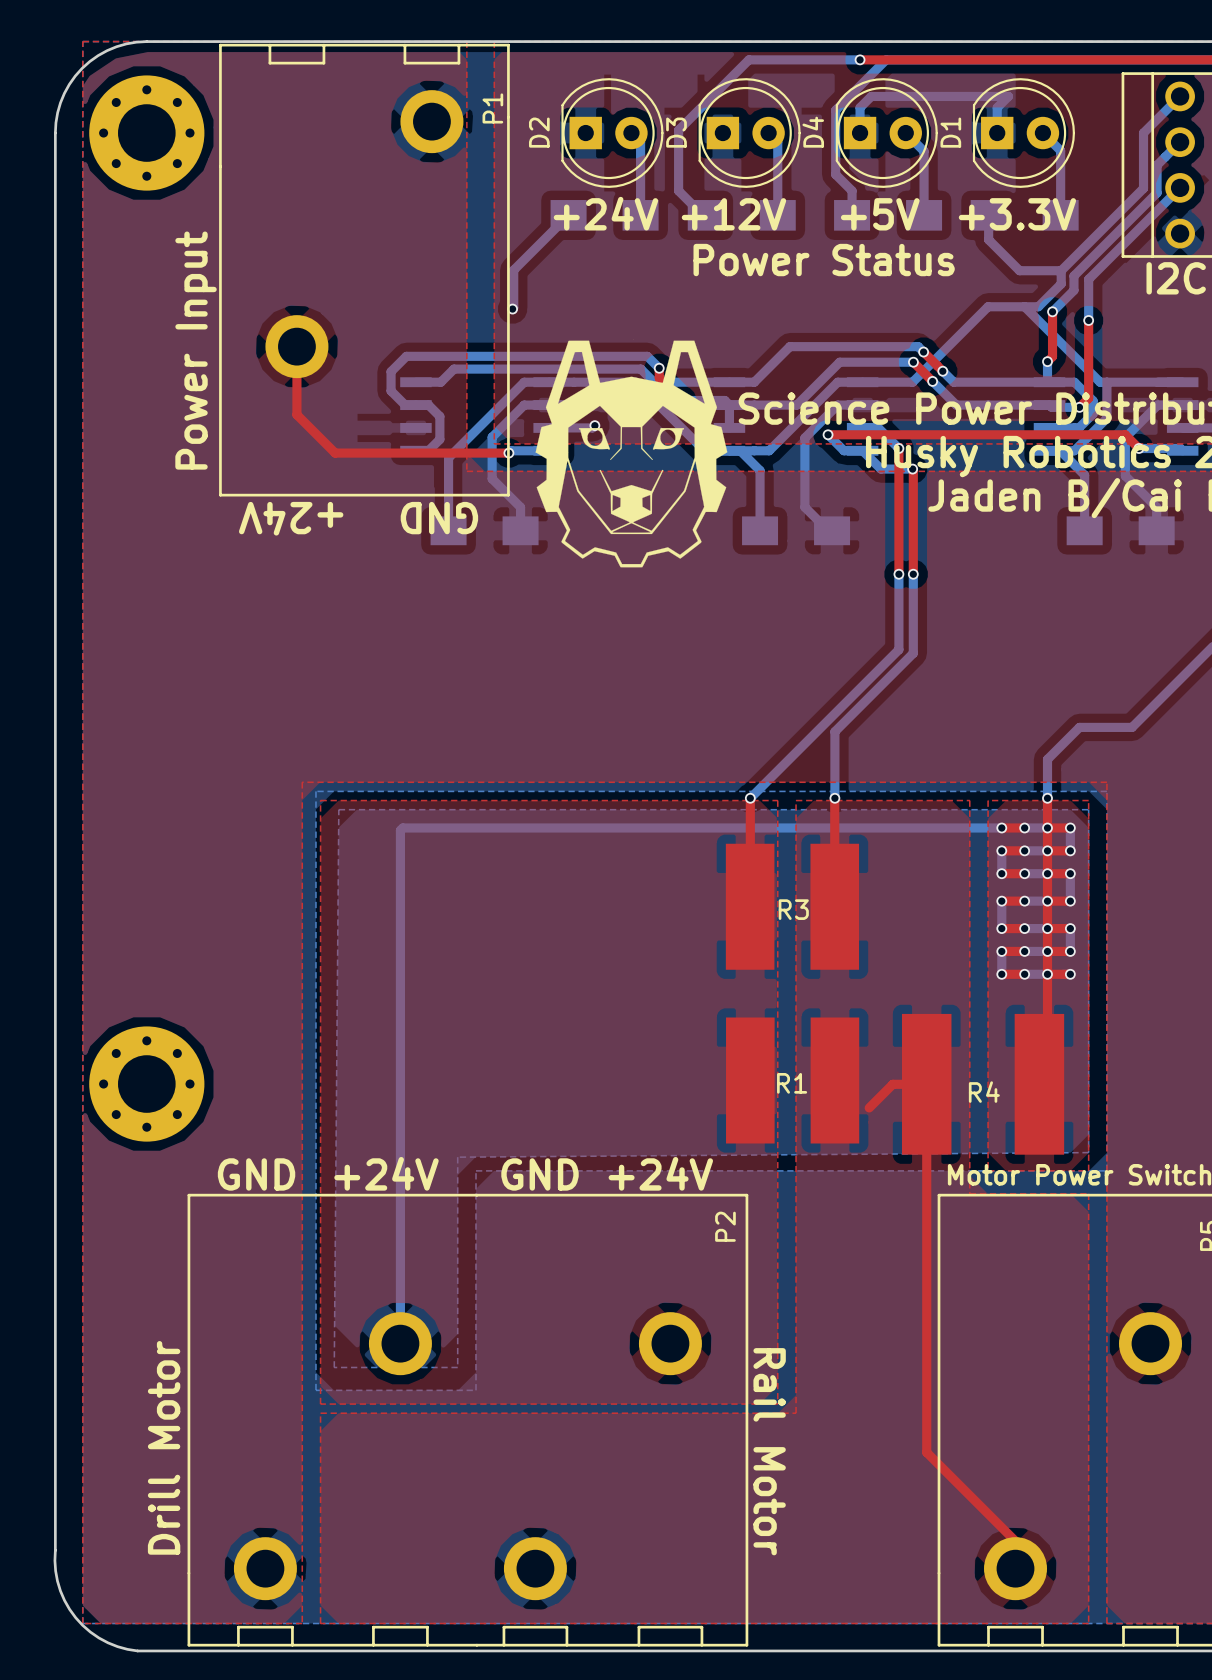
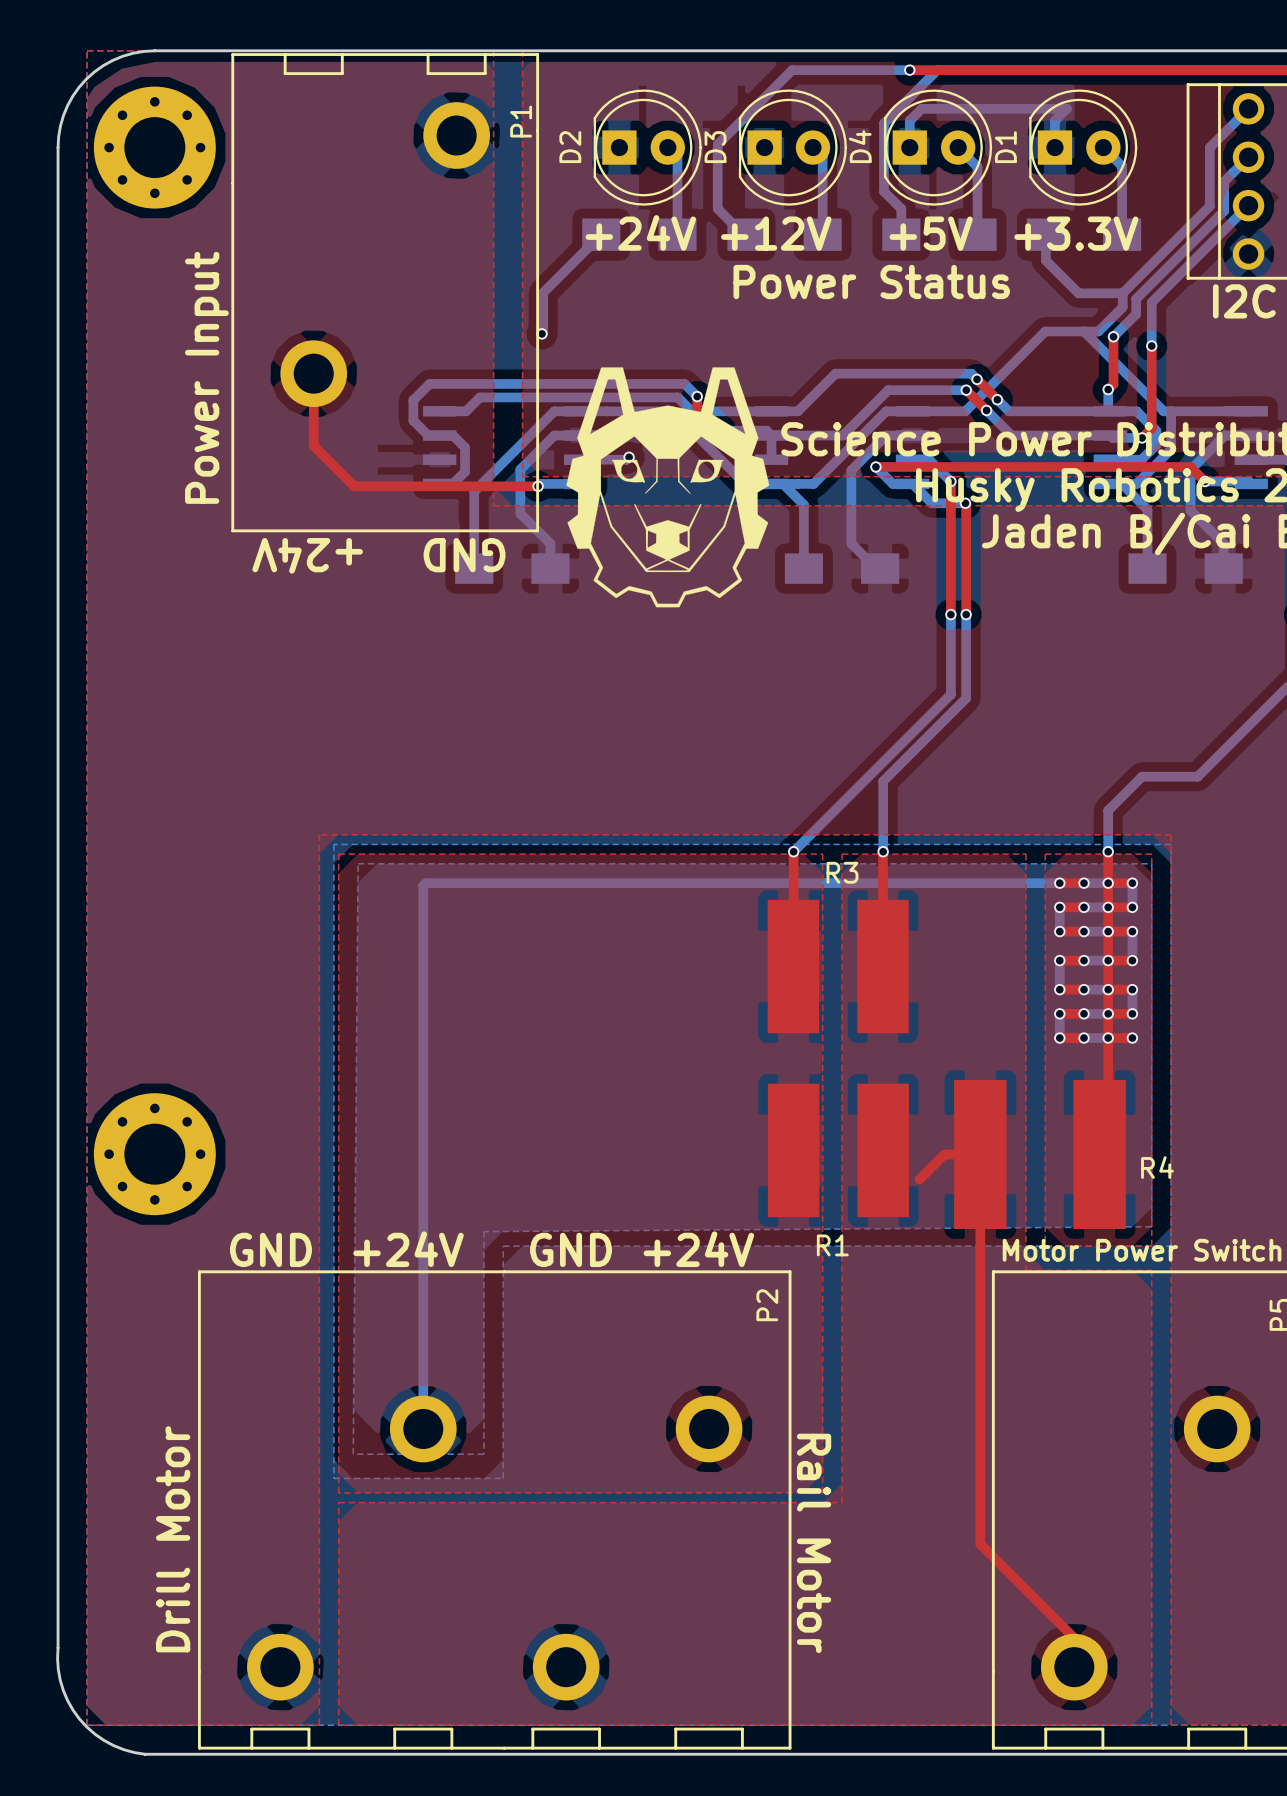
R3 name position: R3 (793, 909) -> R3 (842, 872)
R1 name position: R1 (792, 1083) -> R1 (832, 1245)
R4 name position: R4 (984, 1092) -> R4 (1157, 1167)

